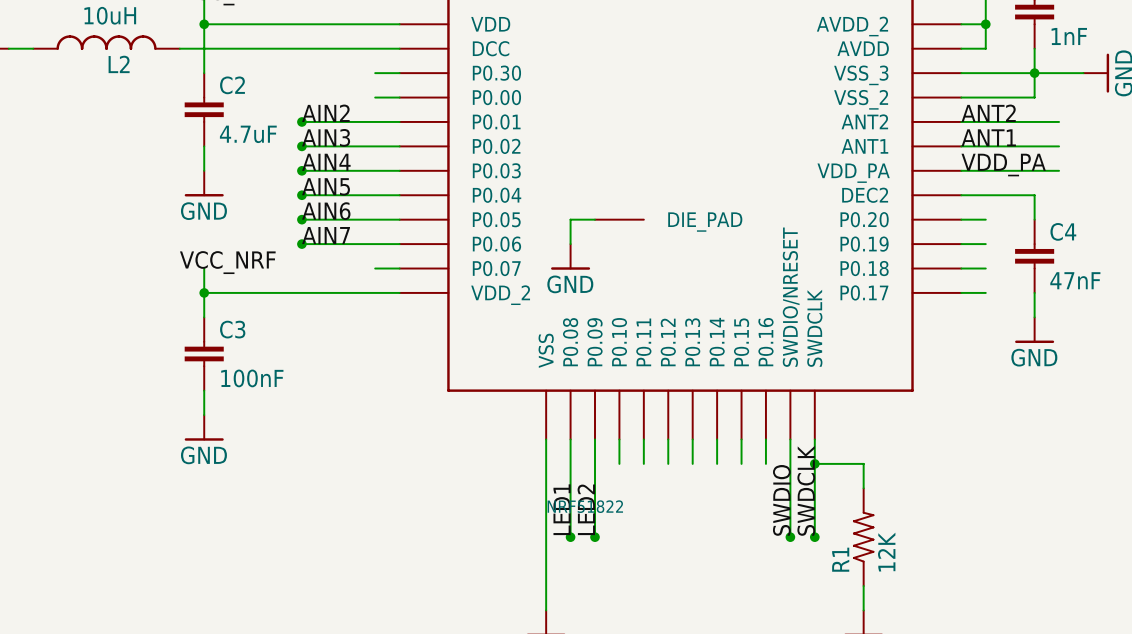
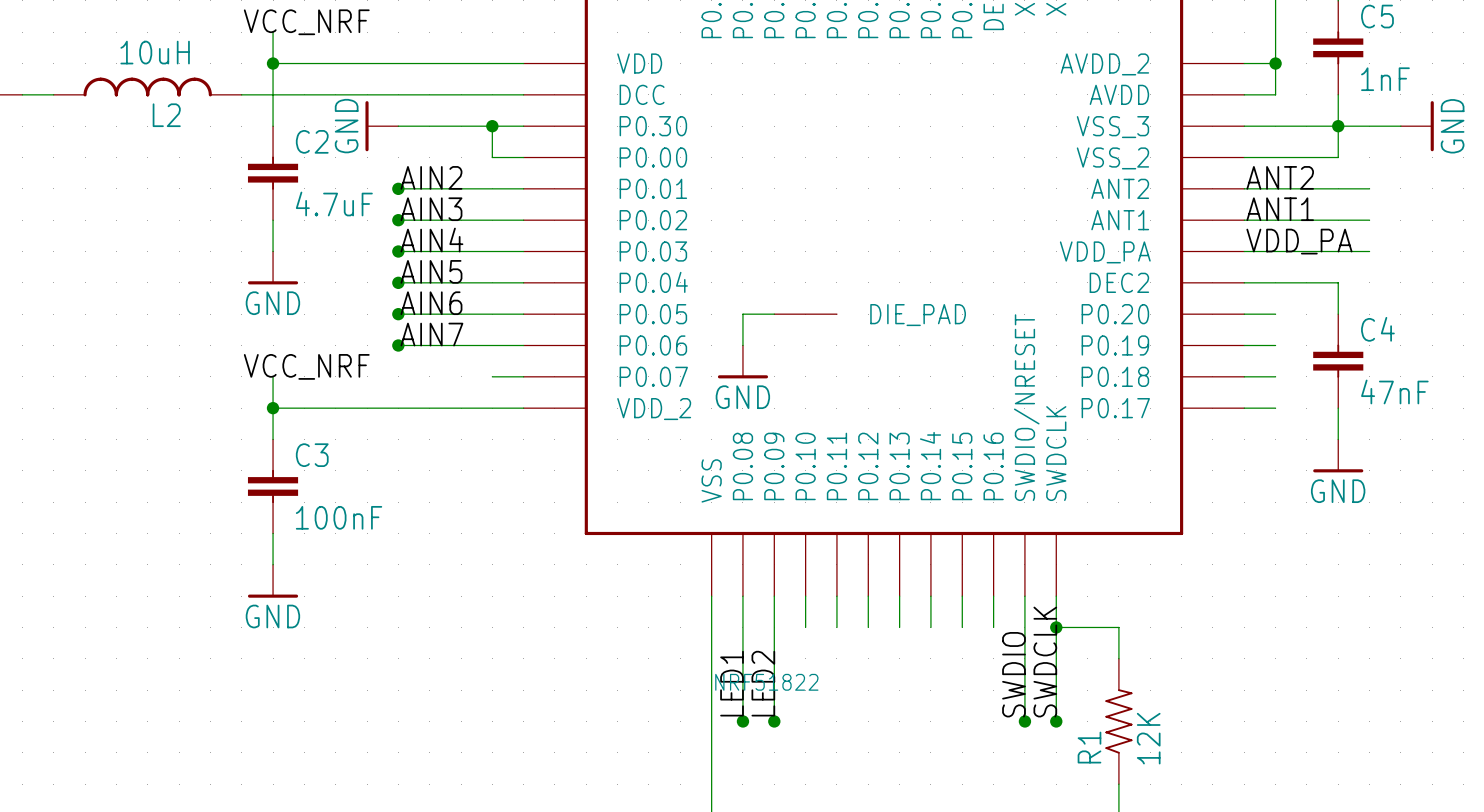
power symbol: none -> GND (381, 126)
wire: none -> (398, 126) (492, 126) (492, 157)
junction: none -> (492, 126)

